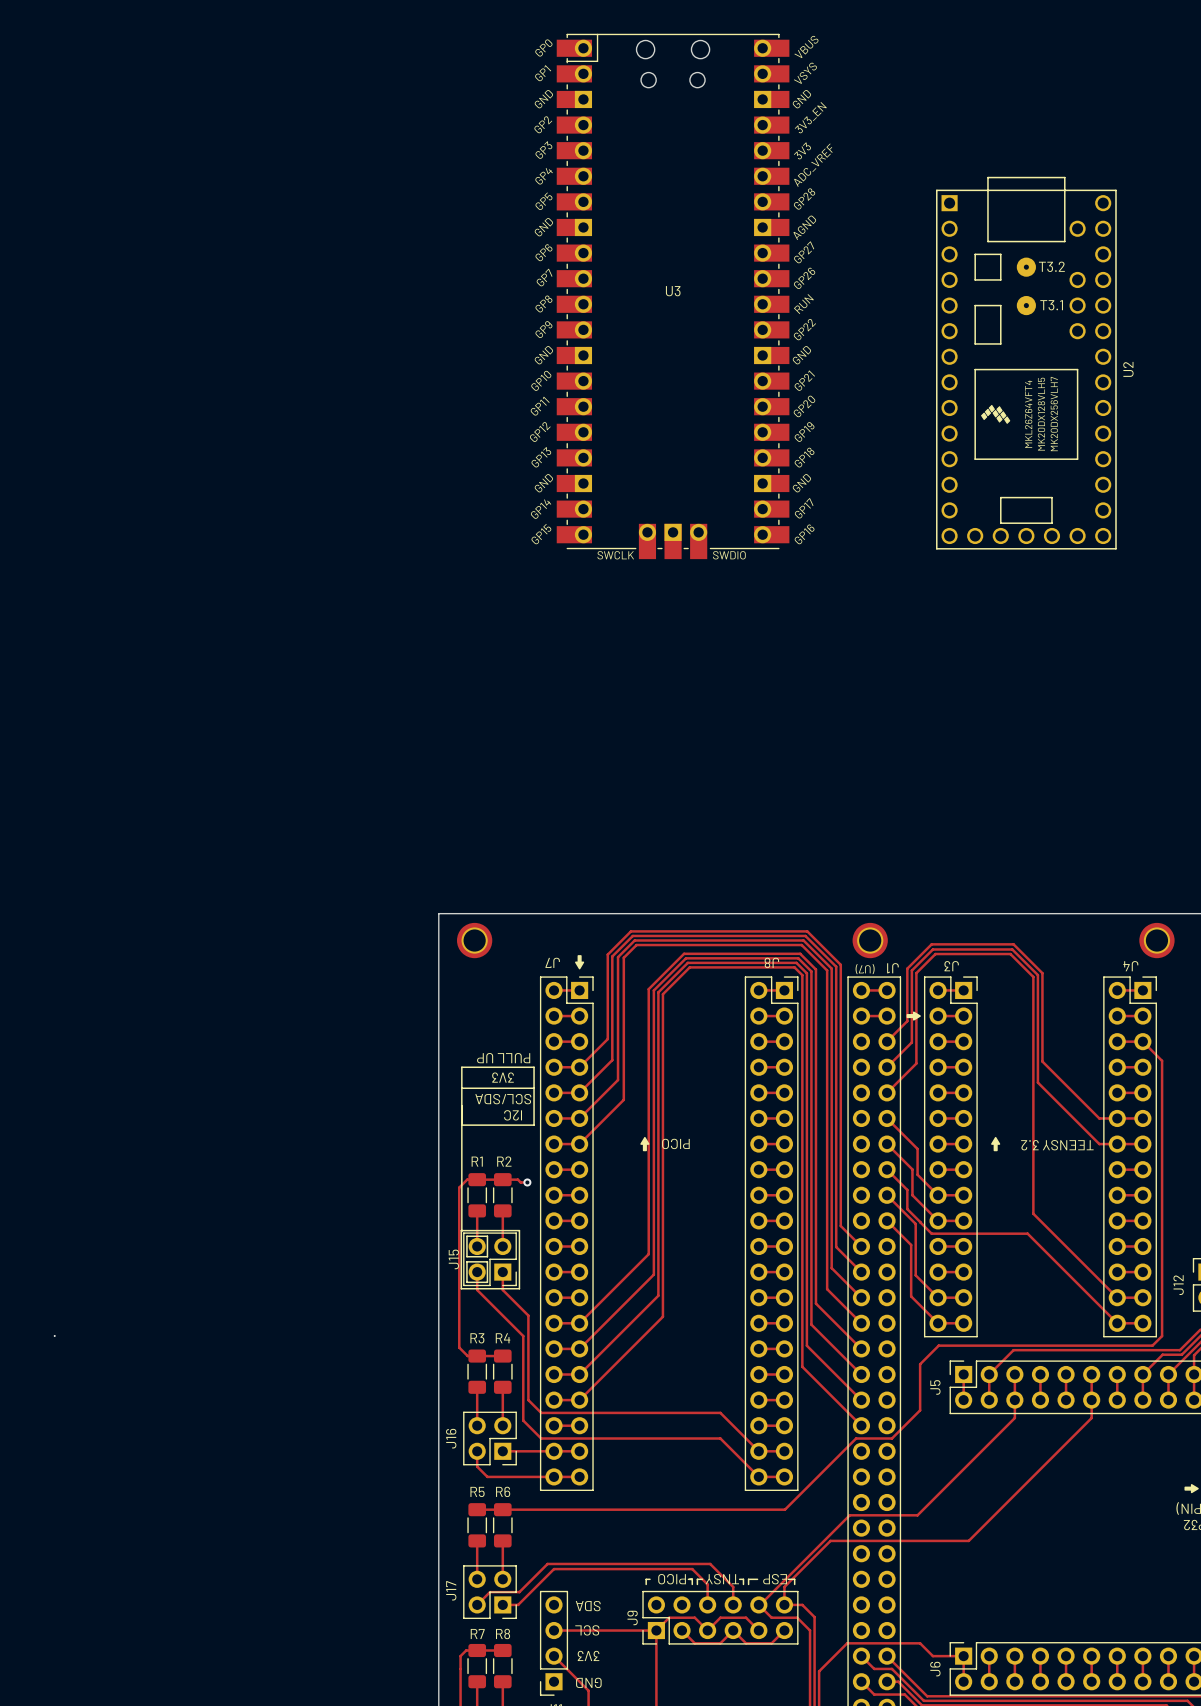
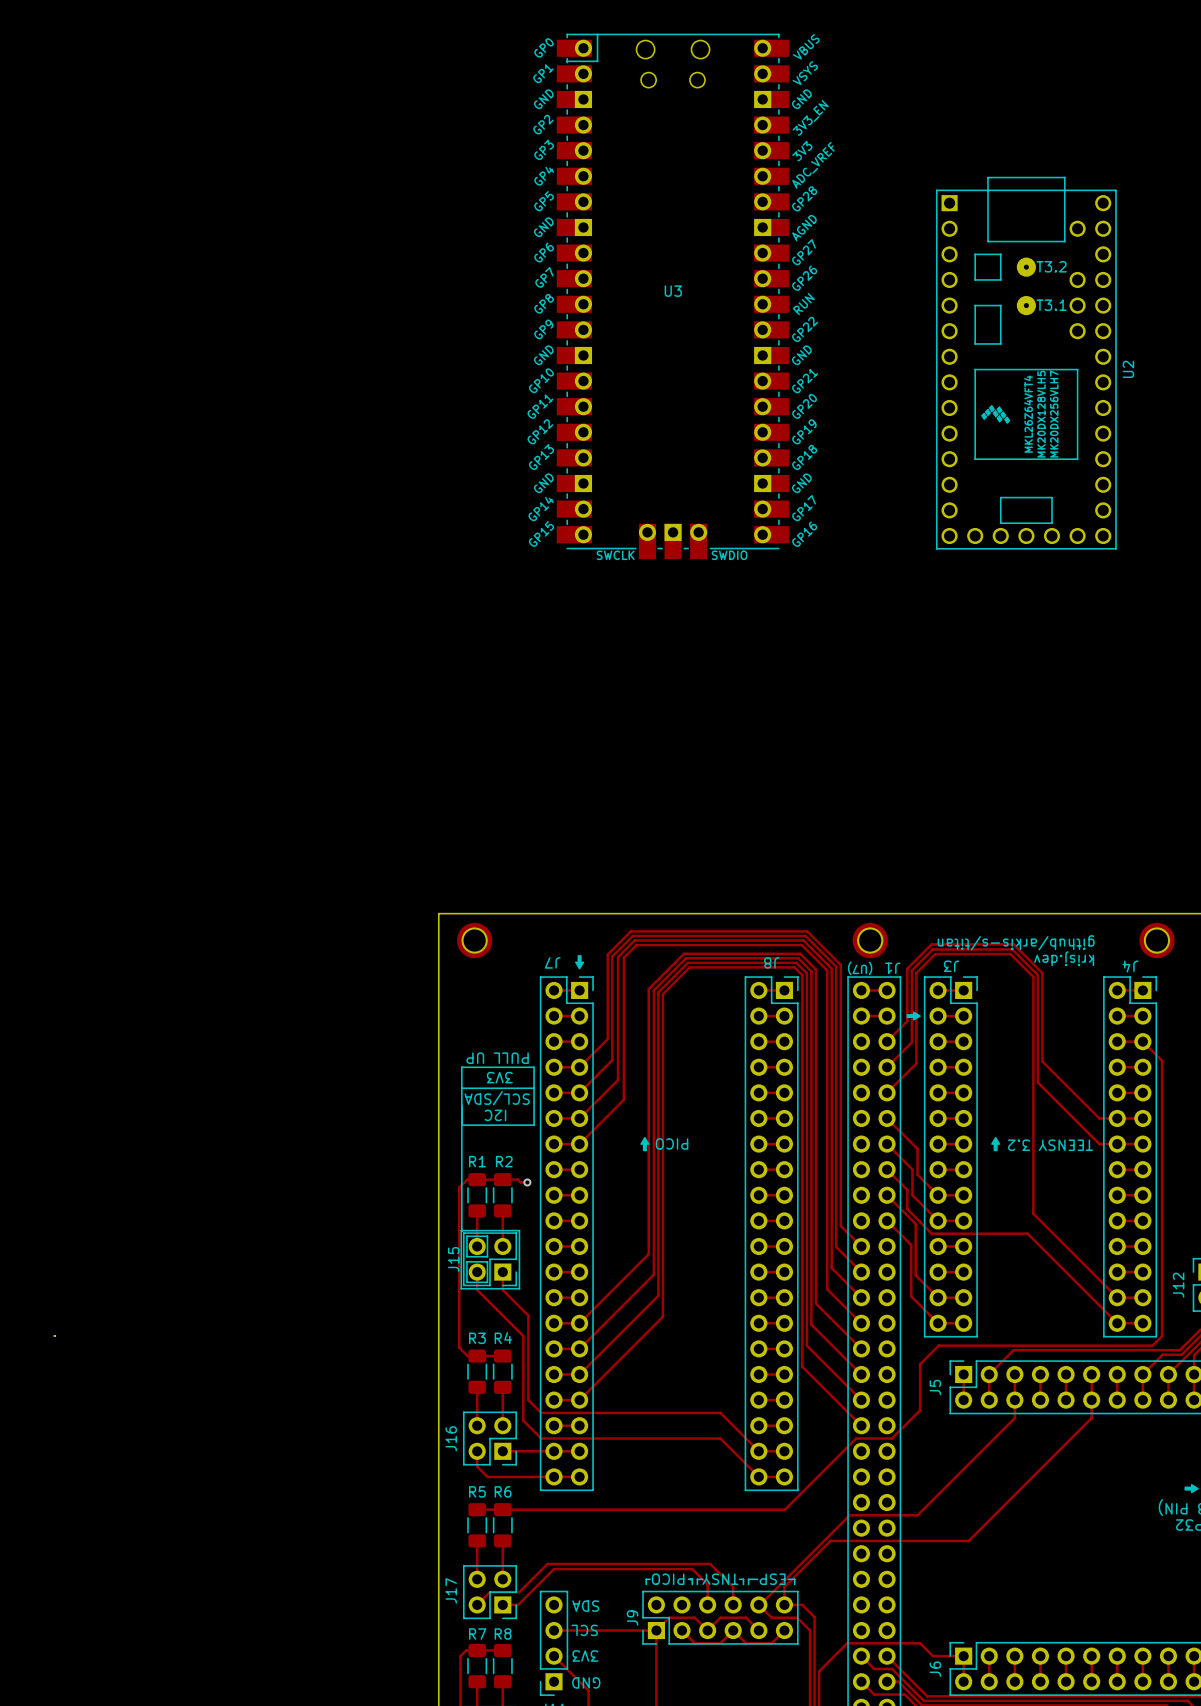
text: none -> github/arkis-s/titan (1016, 942)
text: none -> krisj.dev (1064, 958)

